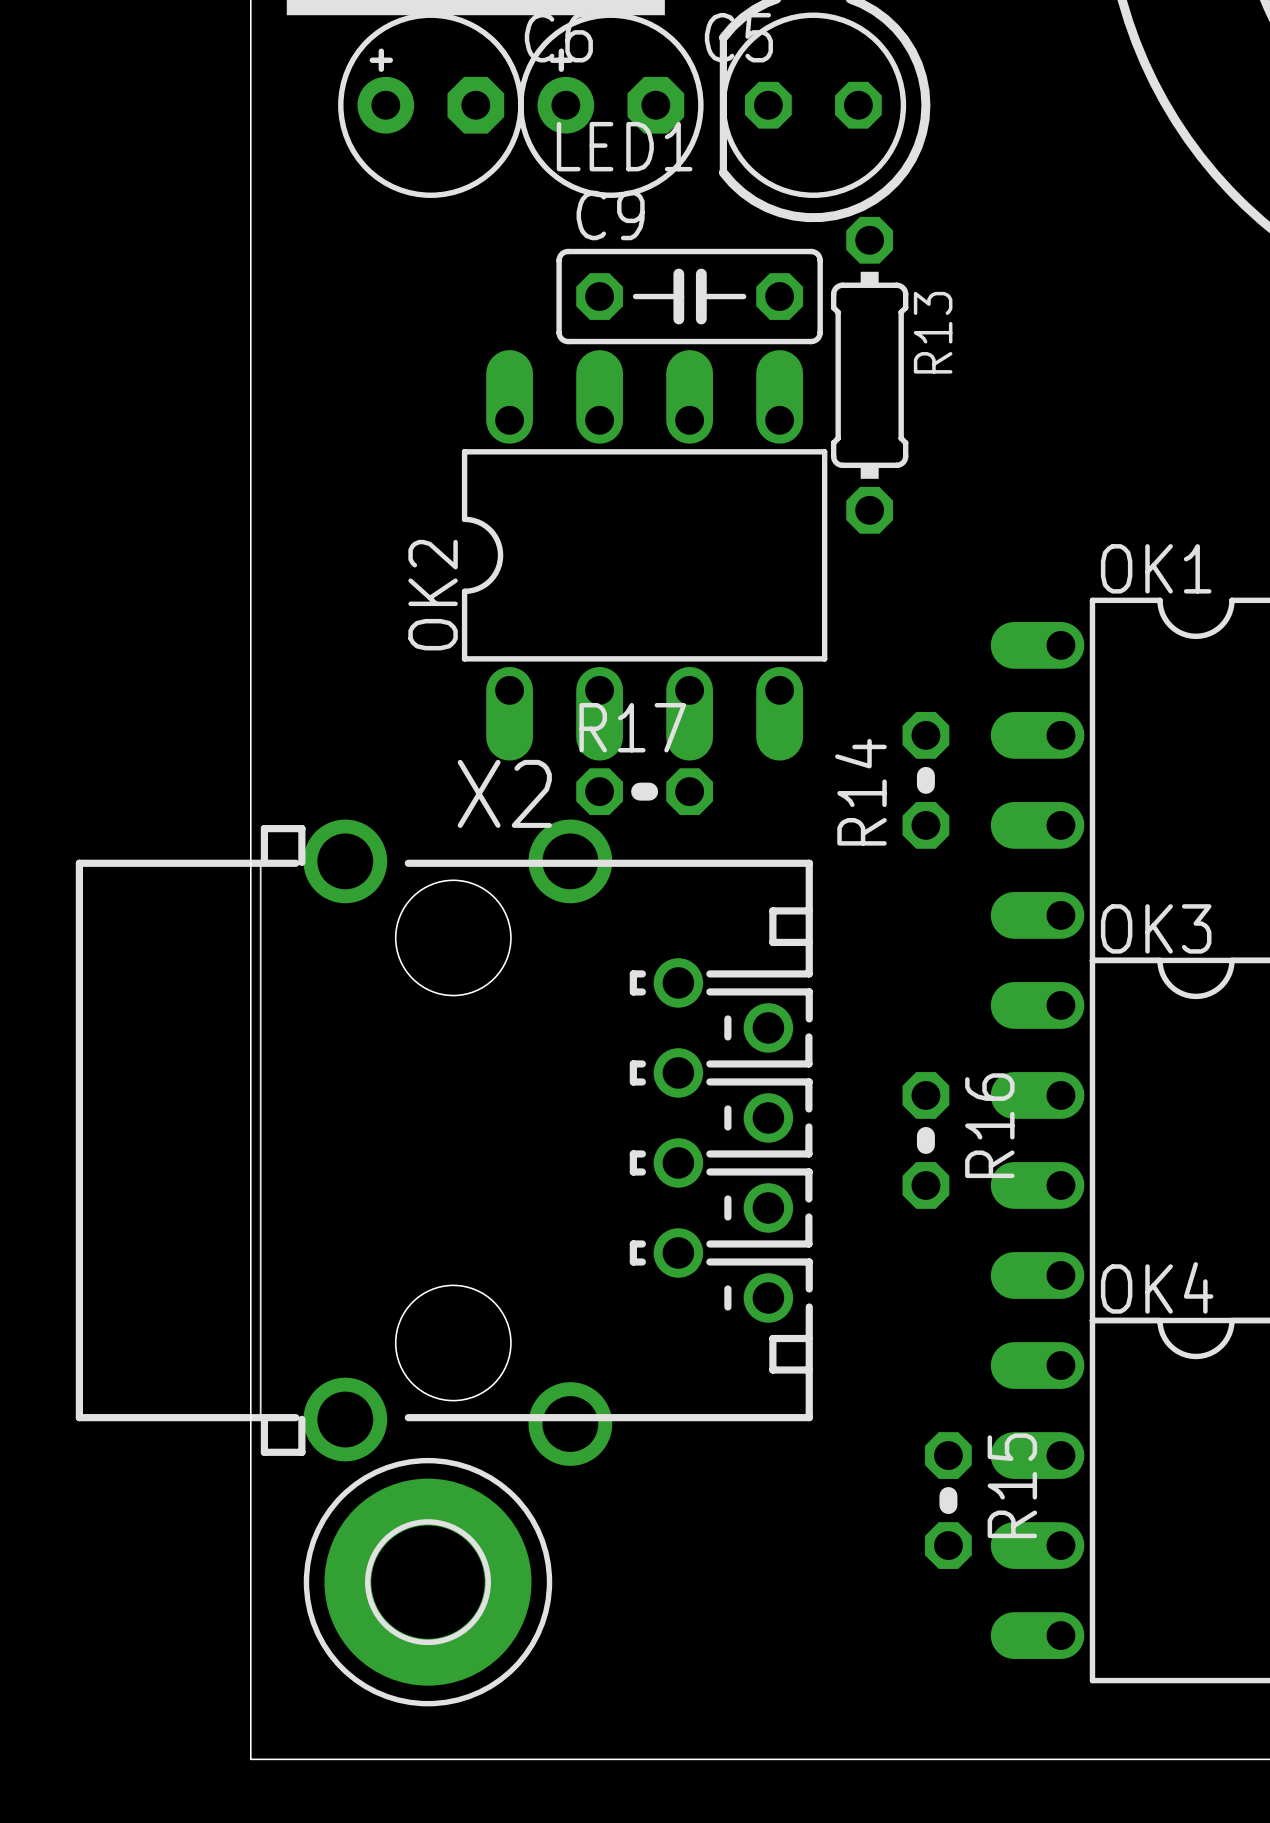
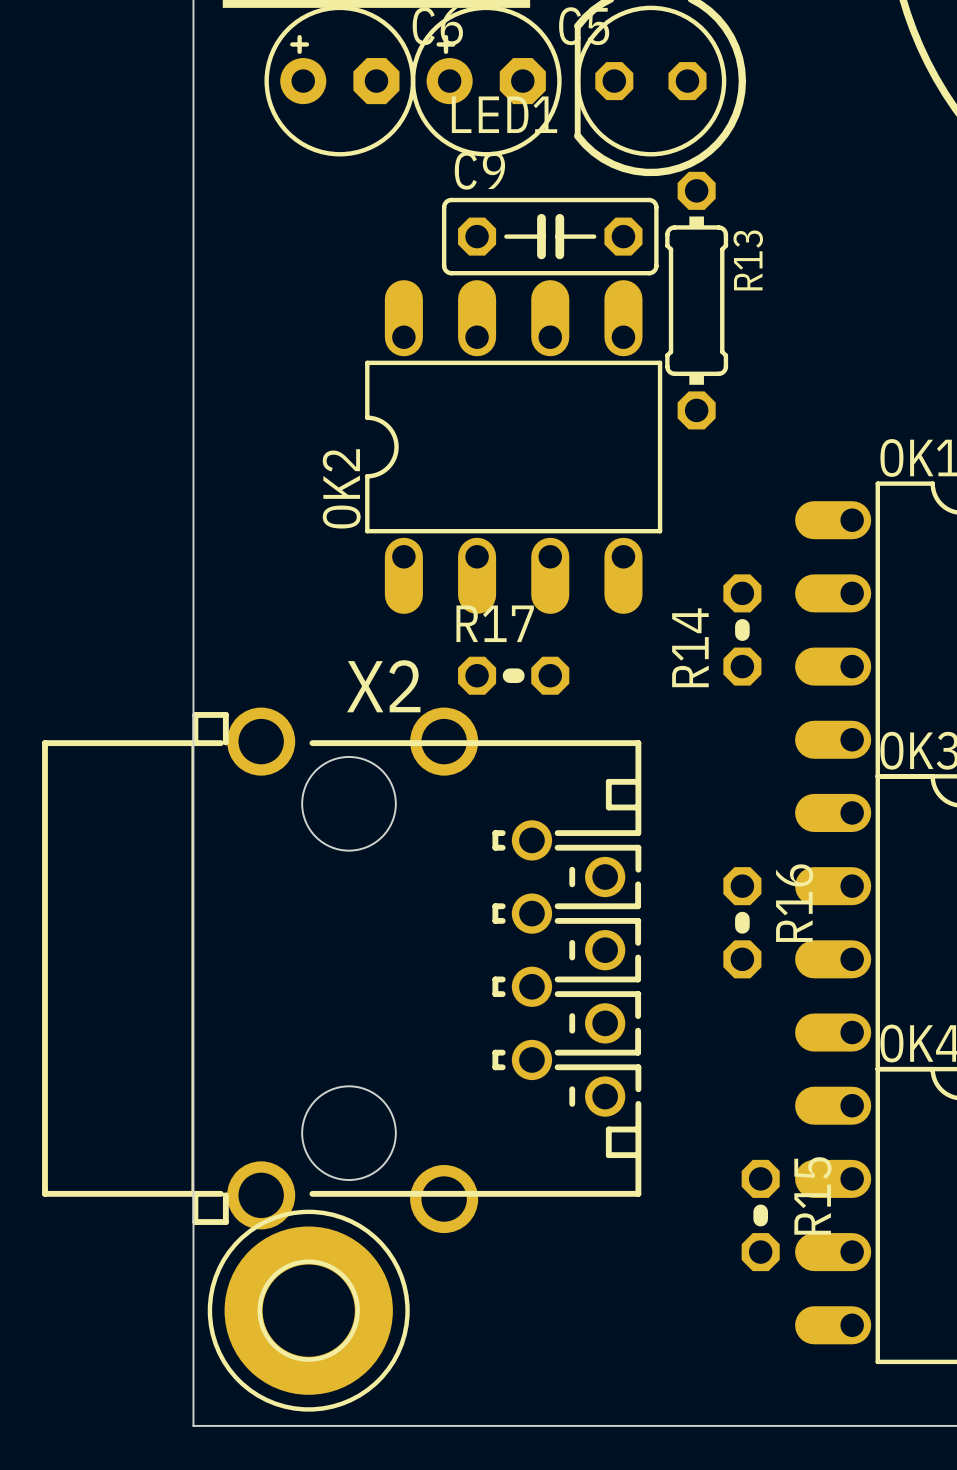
R17 position: (644, 791) -> (513, 675)
X2 position: (444, 1142) -> (341, 970)
part position: (427, 1582) -> (308, 1310)

